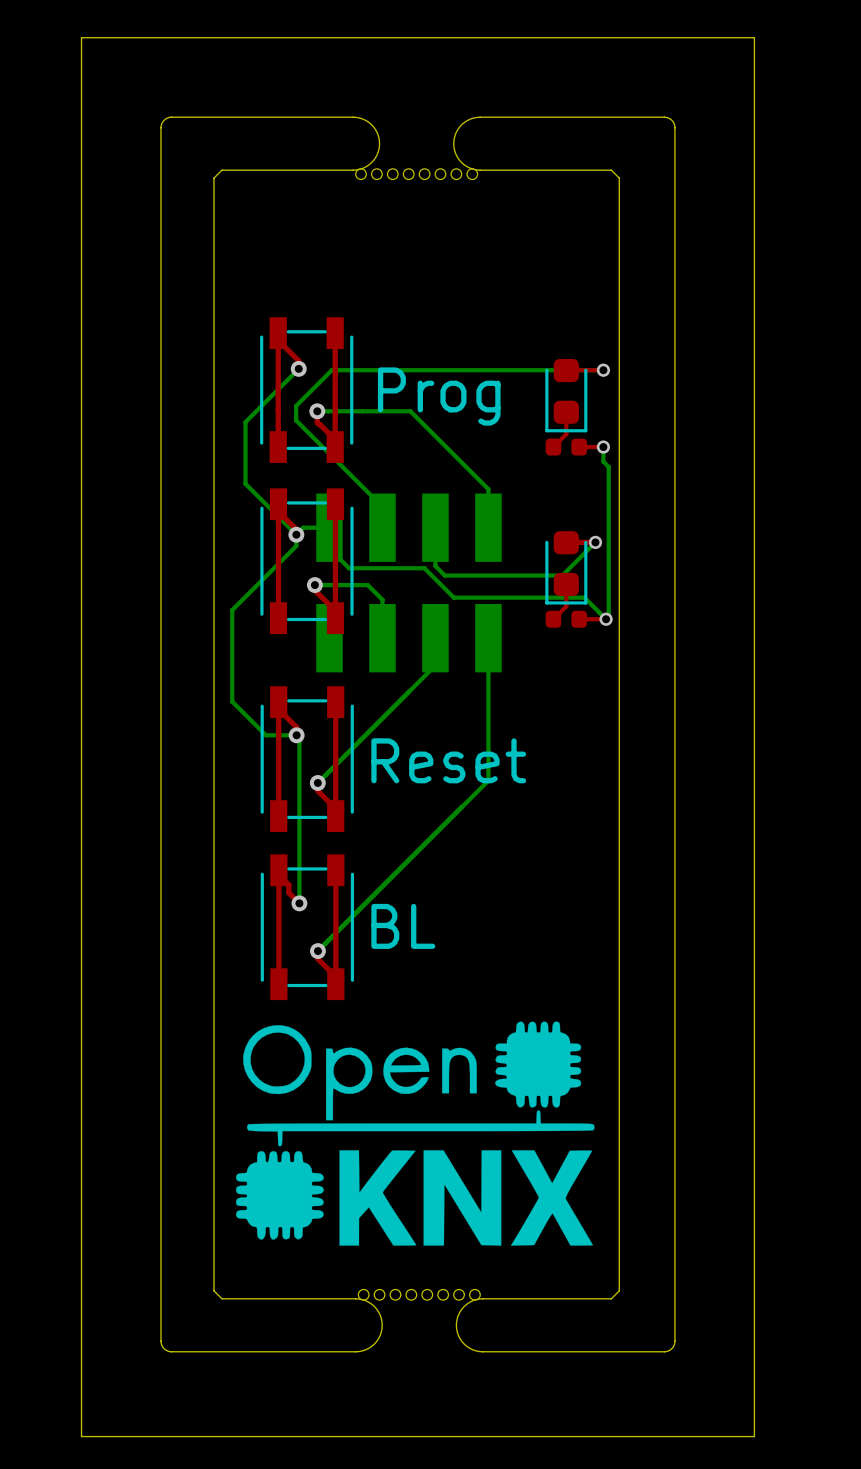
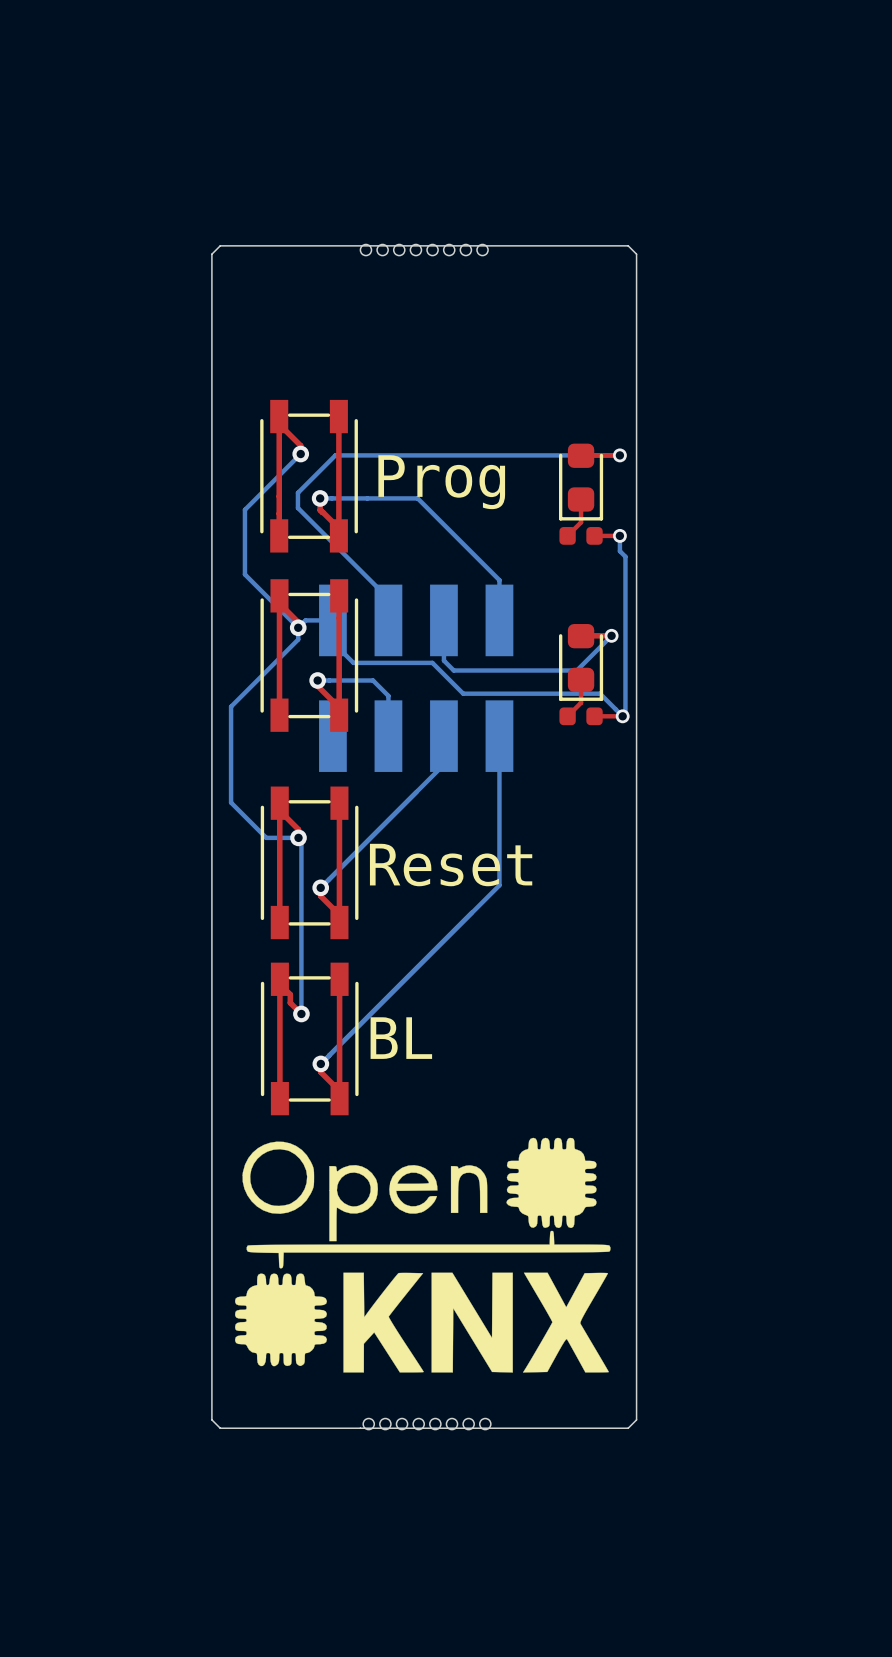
board edge: (81, 37) (81, 1436) (754, 1436) (754, 37) (81, 37) -> none
board edge: (353, 170) (363, 168) (371, 162) (379, 147) (378, 136) (374, 127) (359, 118) (171, 117) (165, 119) (161, 125) (161, 1343) (165, 1349) (171, 1351) (362, 1350) (376, 1341) (381, 1332) (381, 1321) (378, 1312) (371, 1304) (355, 1298) -> (357, 245) (490, 245)
board edge: (480, 170) (470, 168) (461, 162) (453, 147) (454, 136) (459, 127) (473, 118) (664, 117) (670, 119) (674, 125) (674, 1343) (670, 1349) (664, 1351) (476, 1350) (461, 1341) (457, 1332) (456, 1321) (459, 1312) (466, 1304) (482, 1298) -> (360, 1428) (493, 1428)

